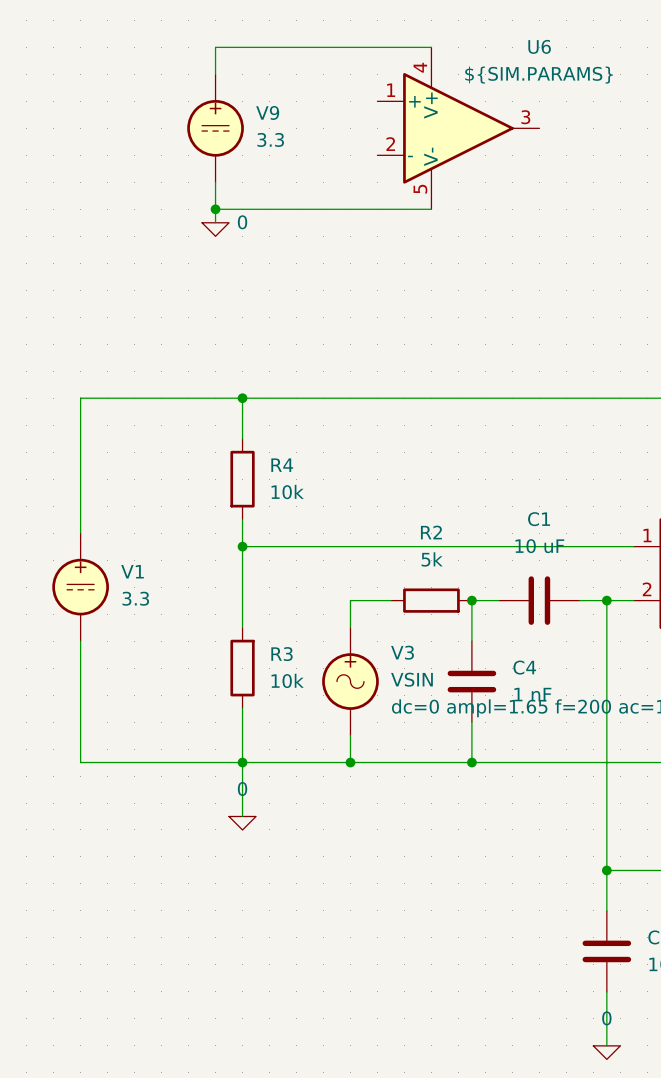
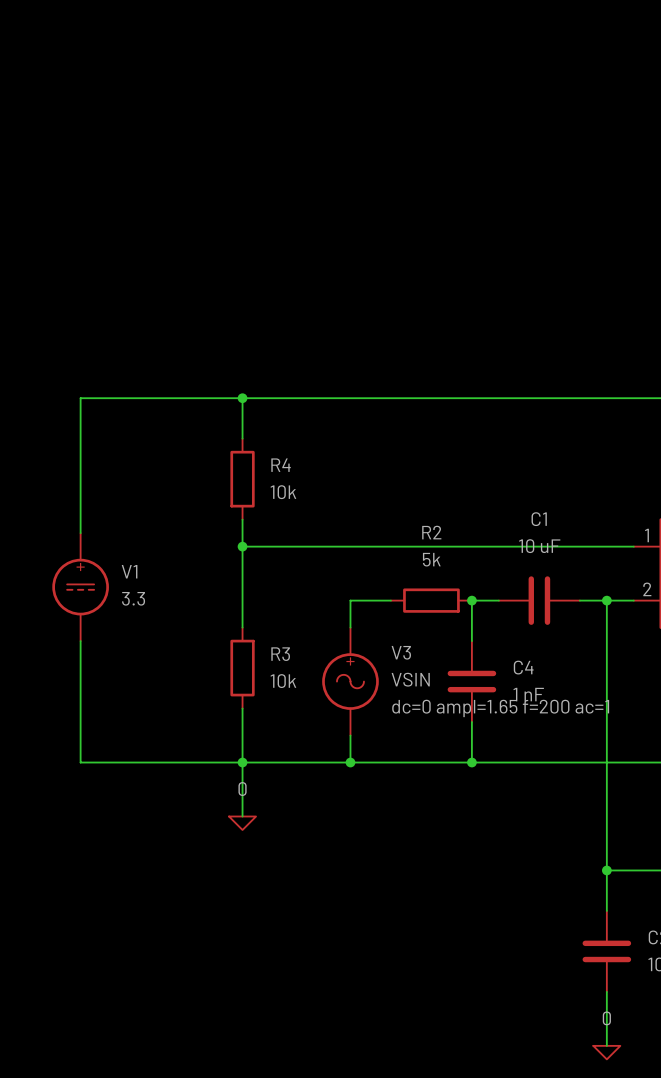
wire: (431, 47) (215, 47) (215, 74) -> none
V9: 3.3 (215, 128) -> none
U6: ${SIM.PARAMS} (458, 128) -> none
wire: (215, 182) (215, 222) -> none
wire: (215, 209) (431, 209) -> none
junction: (215, 209) -> none
power symbol: 0 (215, 229) -> none

